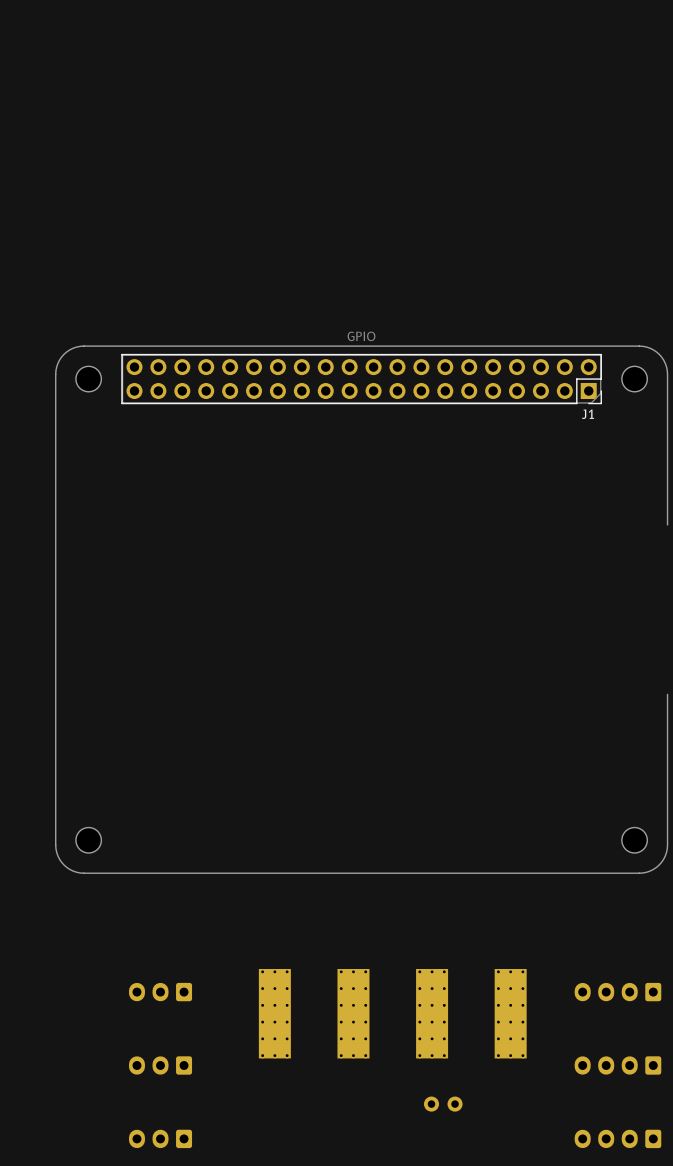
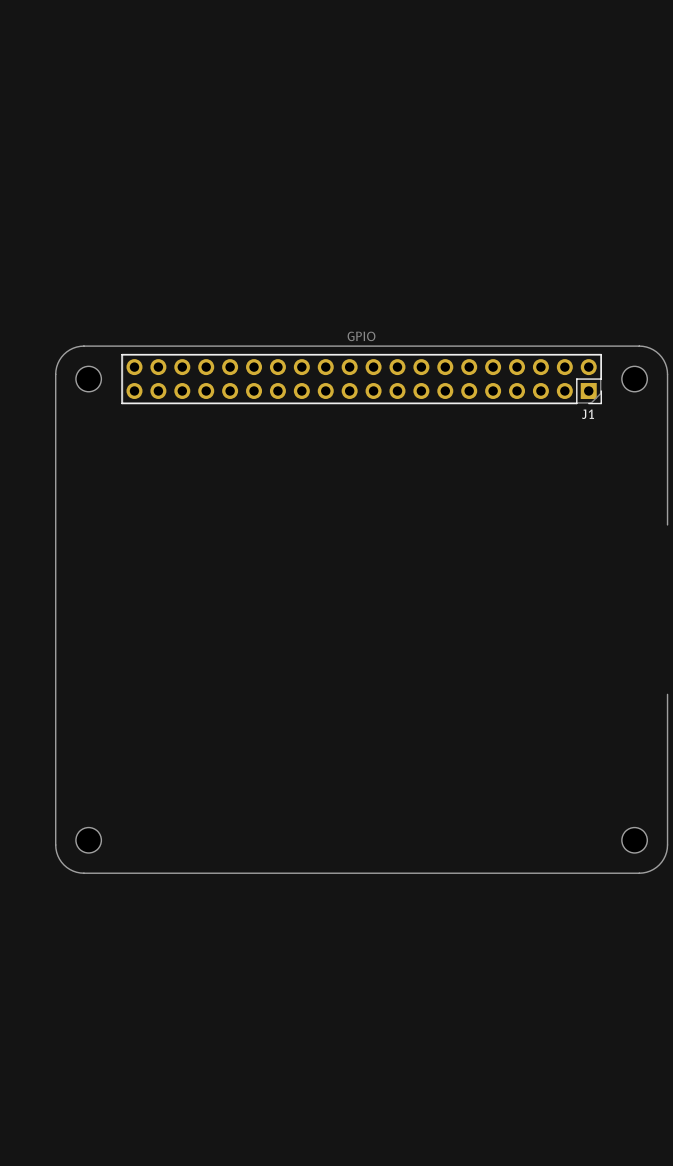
part: (160, 992) -> none
part: (617, 992) -> none
part: (274, 1013) -> none
part: (353, 1013) -> none
part: (432, 1013) -> none
part: (510, 1013) -> none
part: (160, 1065) -> none
part: (617, 1065) -> none
part: (443, 1104) -> none
part: (160, 1138) -> none
part: (617, 1138) -> none

